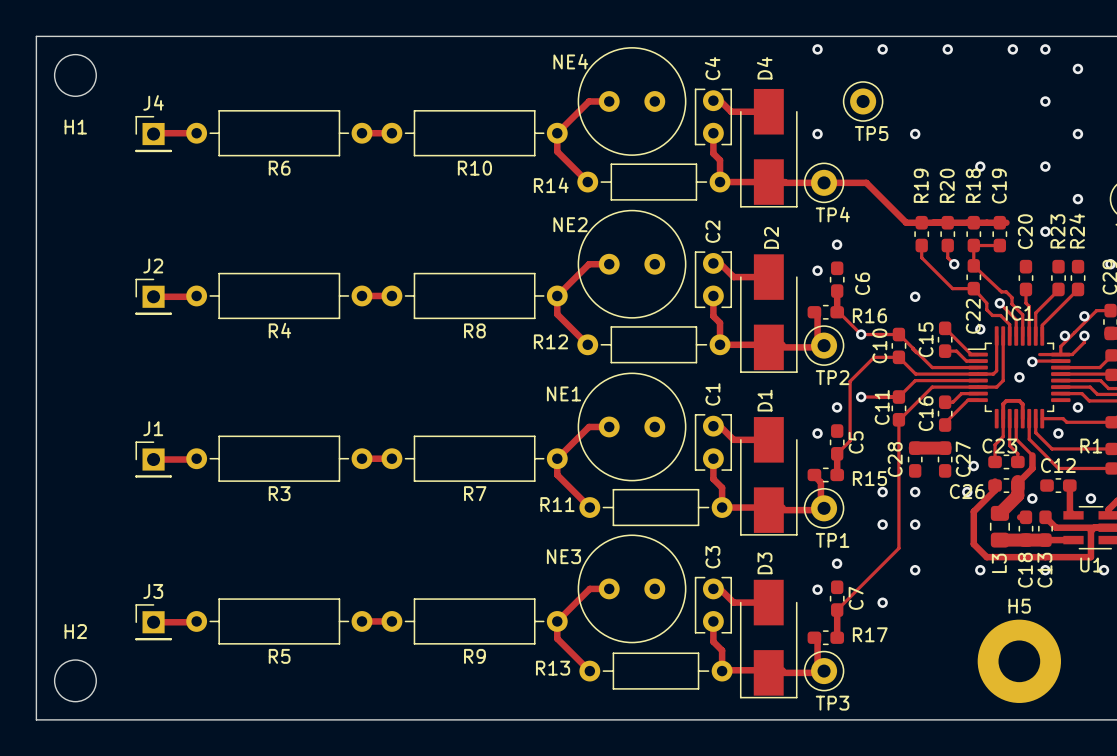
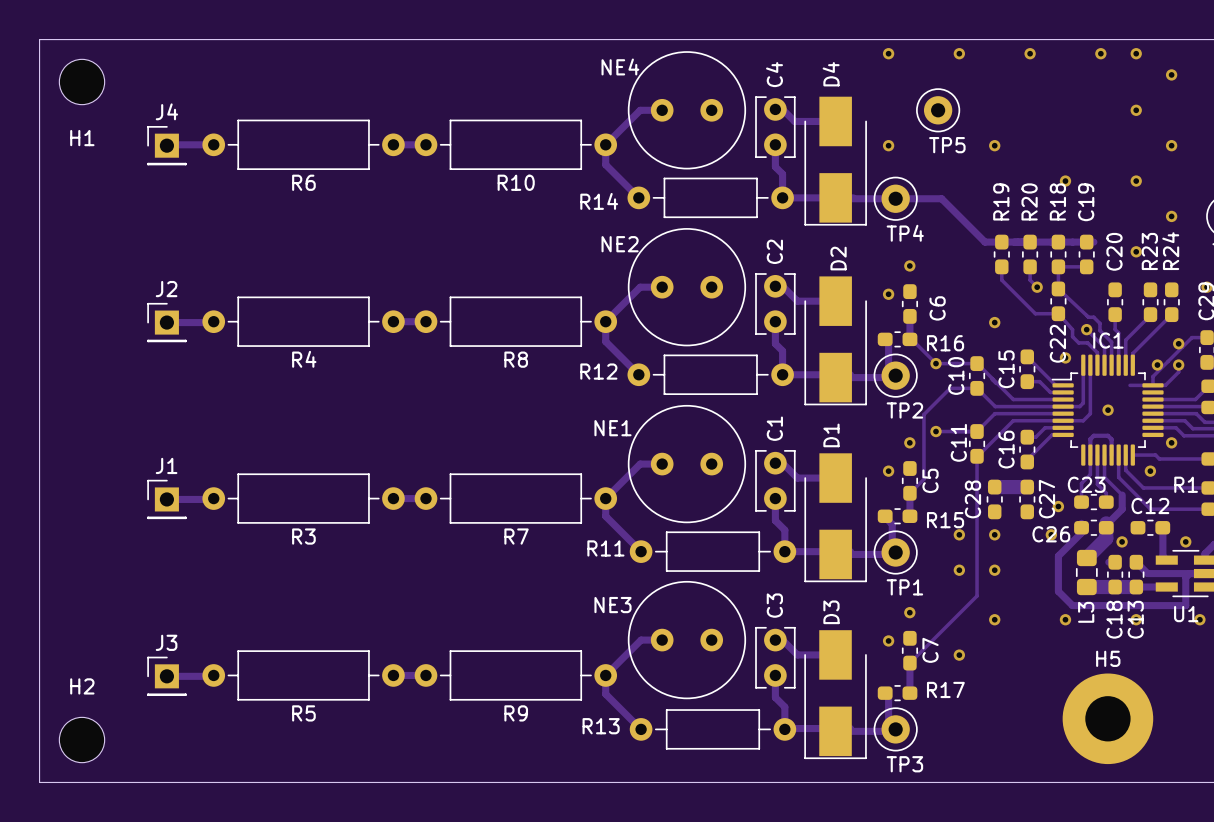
via: (1032, 361) -> none
track: (1060, 361) (1032, 361) -> none

